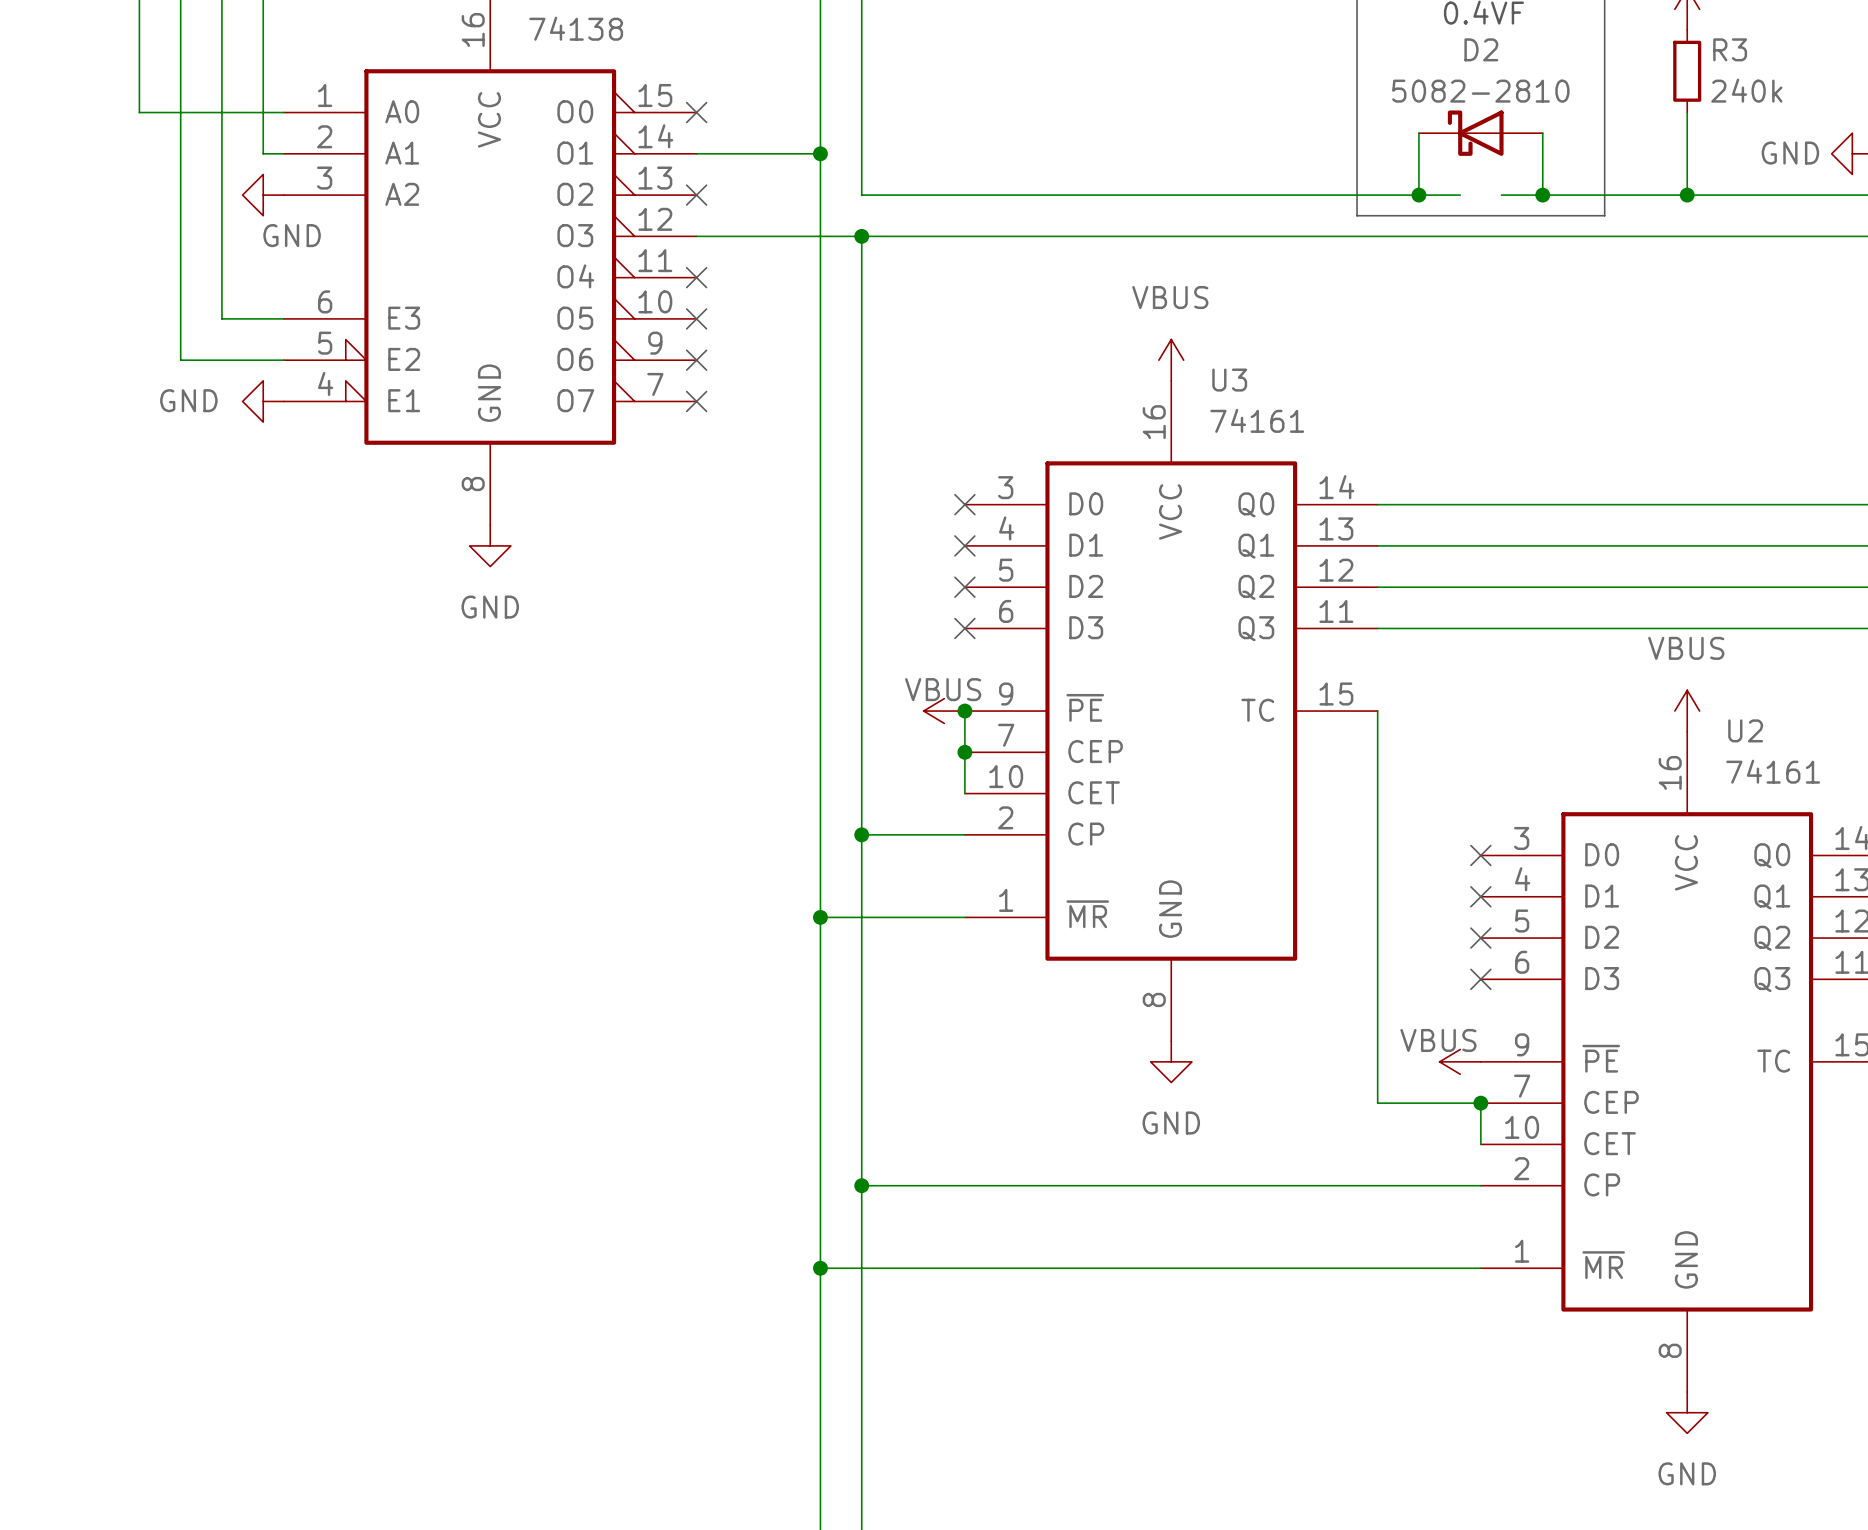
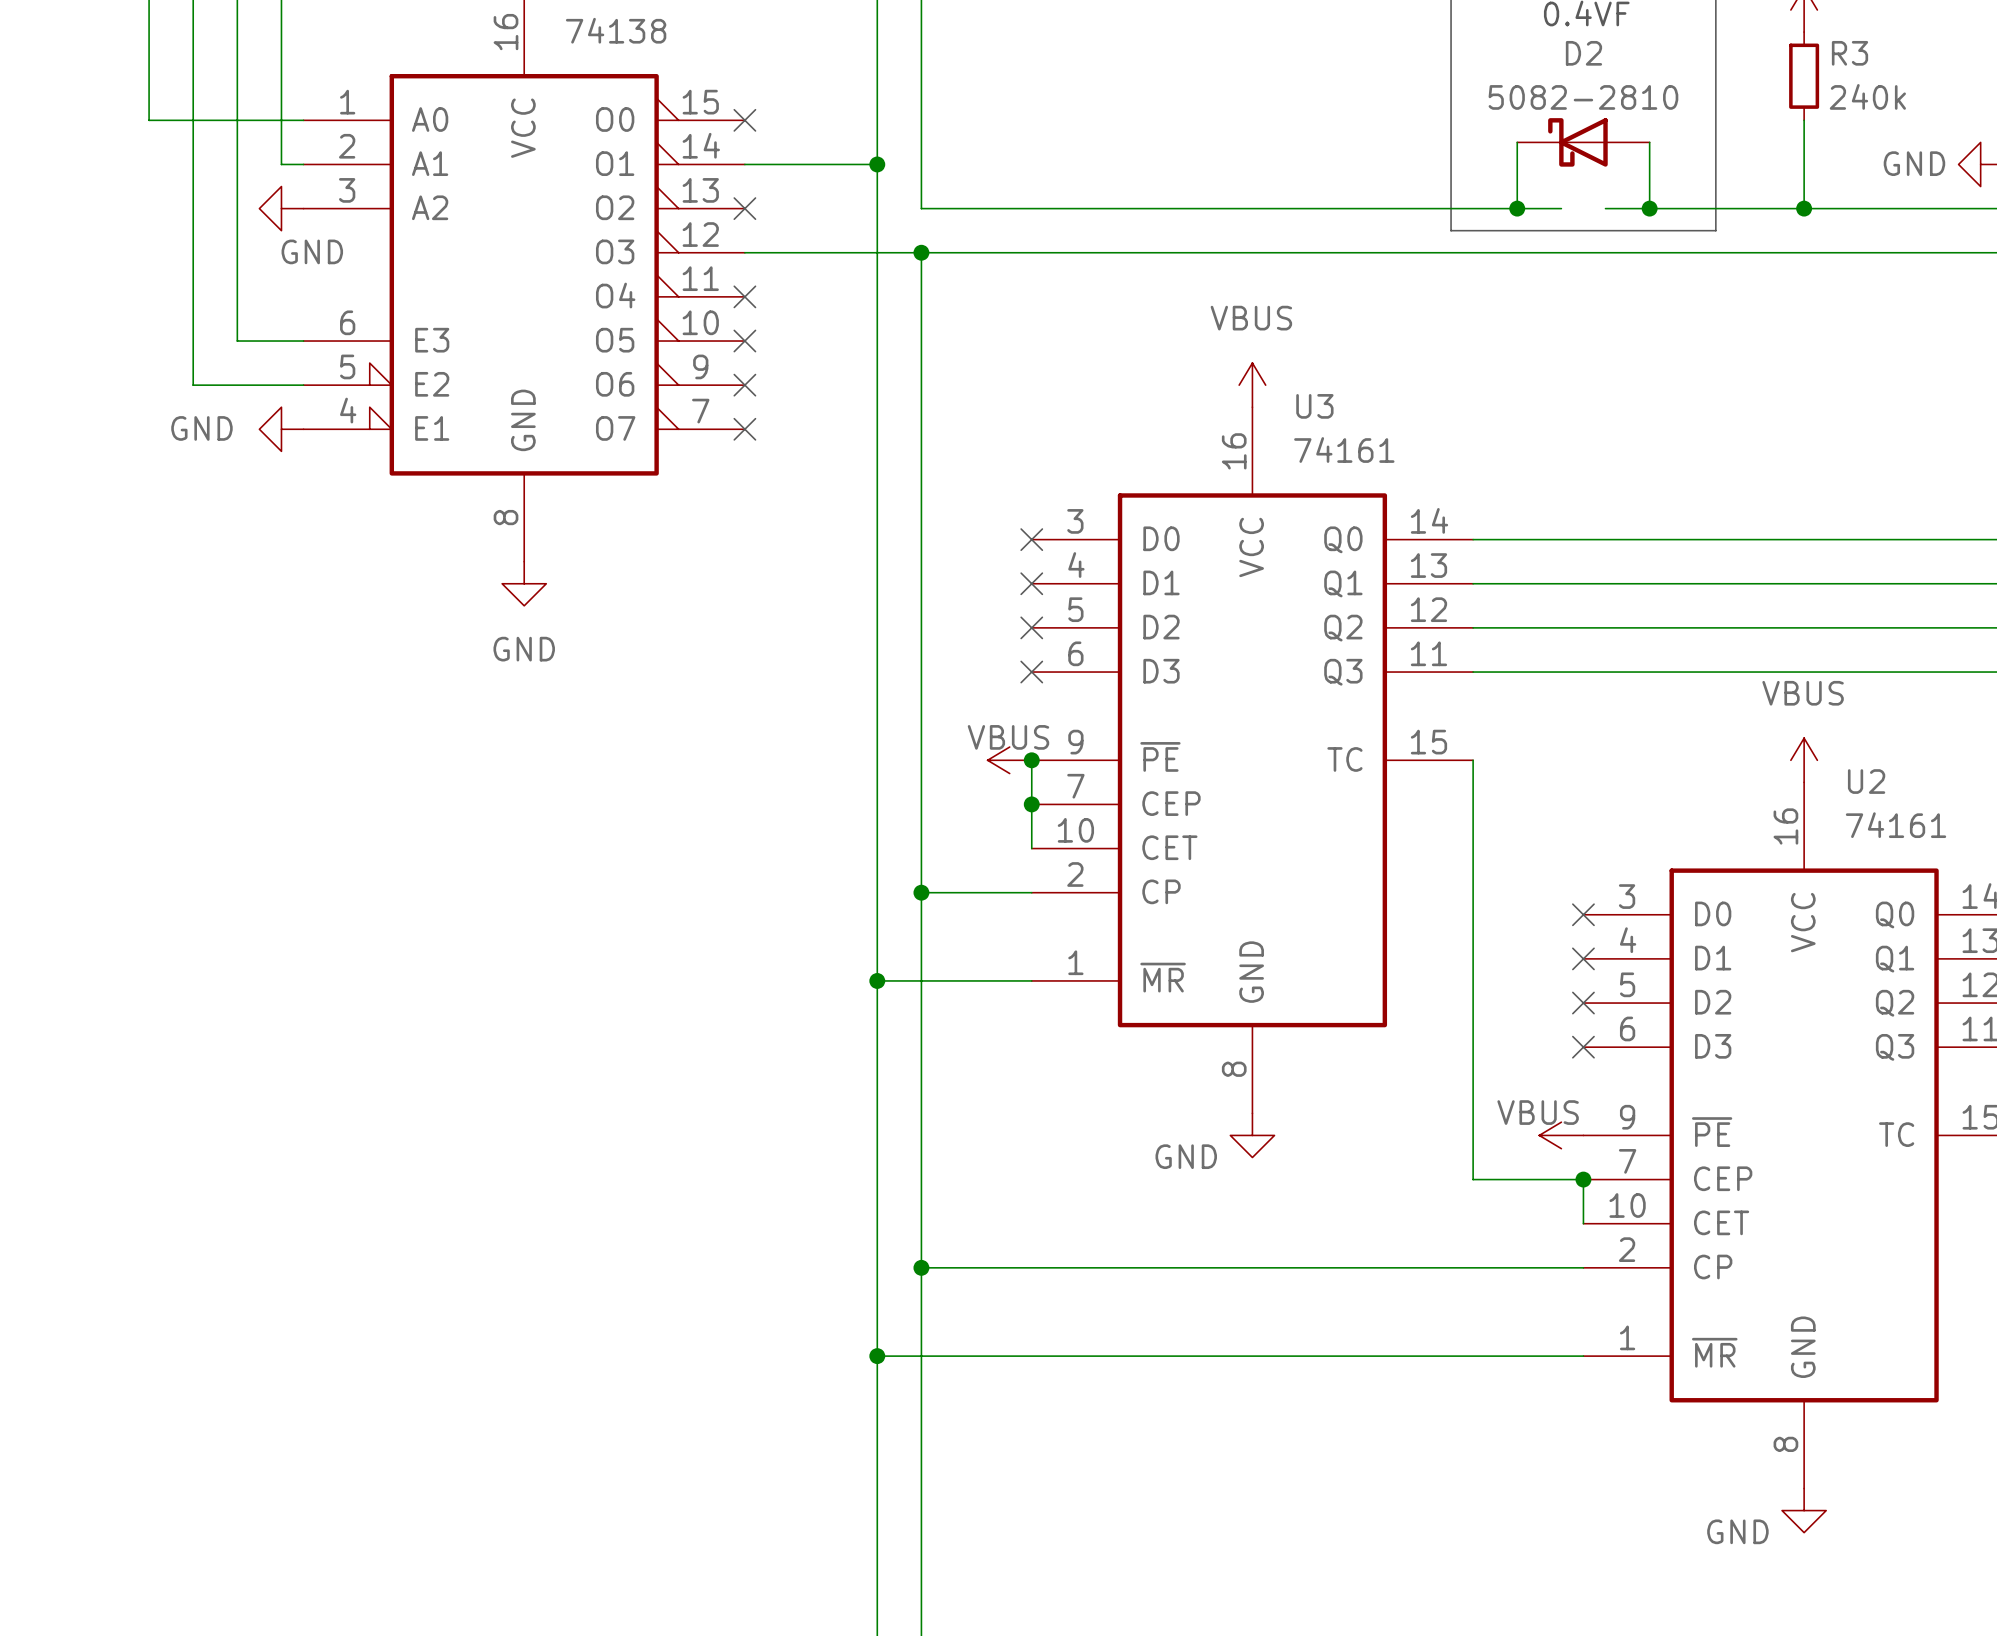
power symbol text position: GND (1171, 1123) -> GND (1186, 1156)
power symbol text position: GND (1687, 1473) -> GND (1737, 1531)

